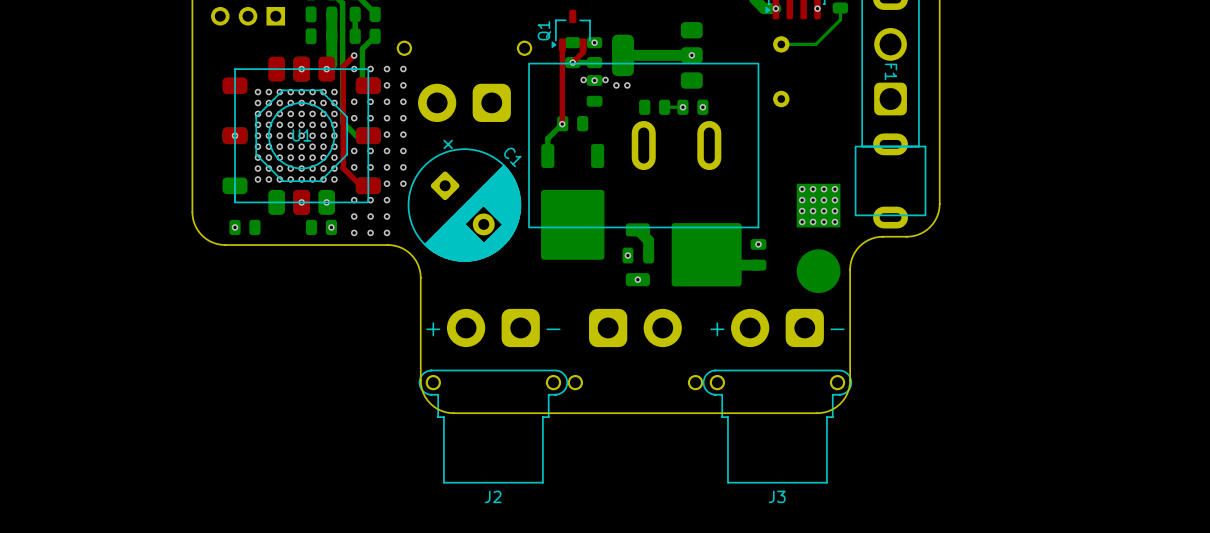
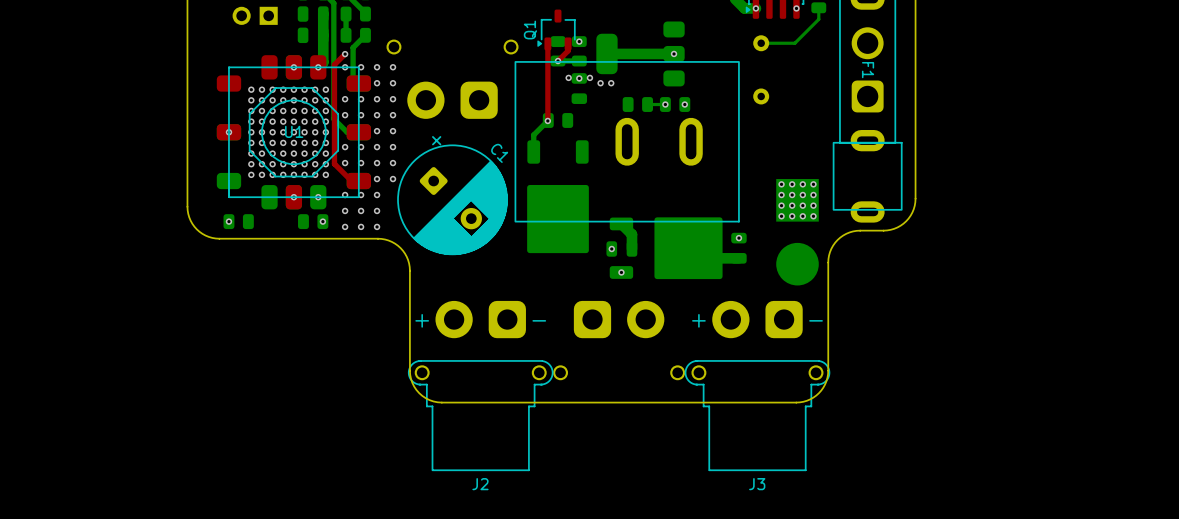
part: (248, 16) -> none

